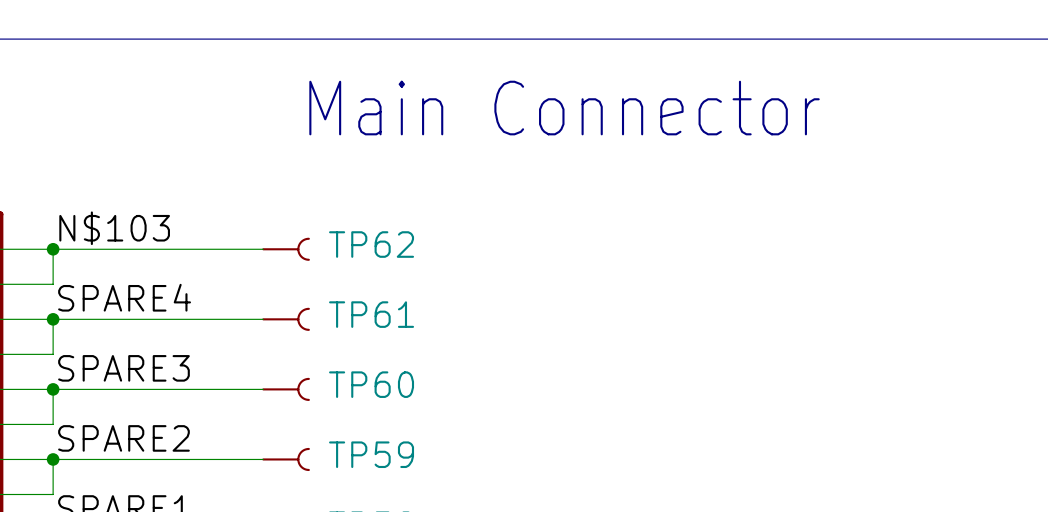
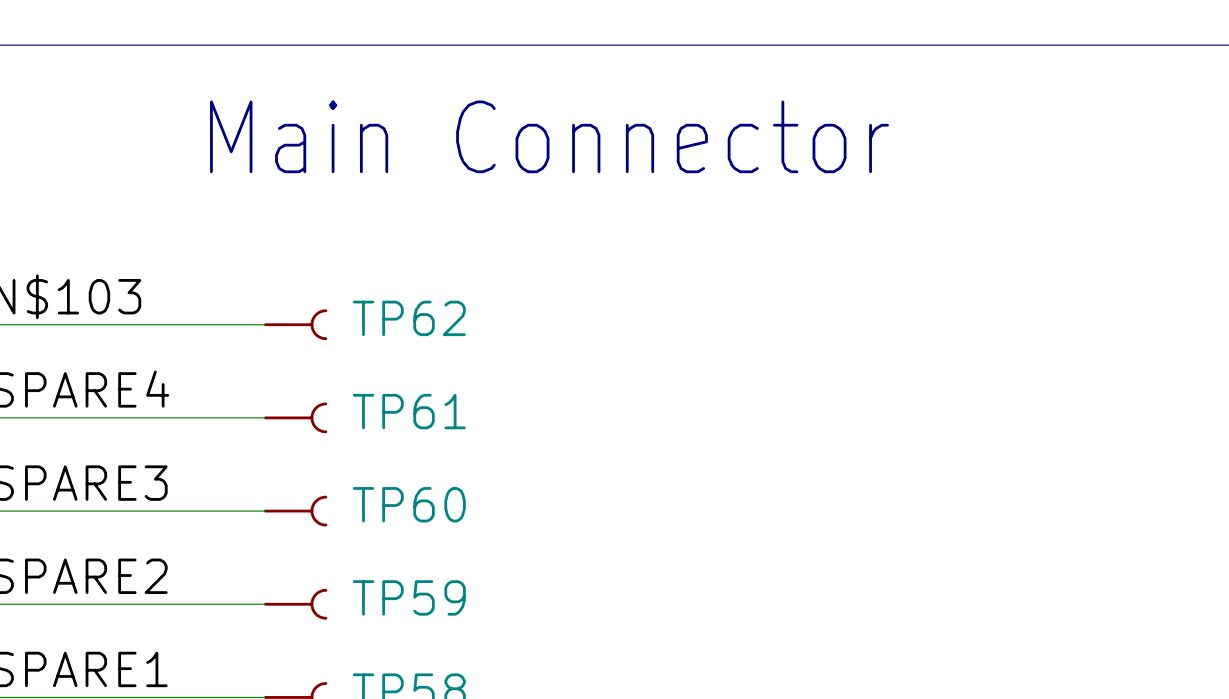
text position: Main Connector (564, 108) -> Main Connector (549, 136)

